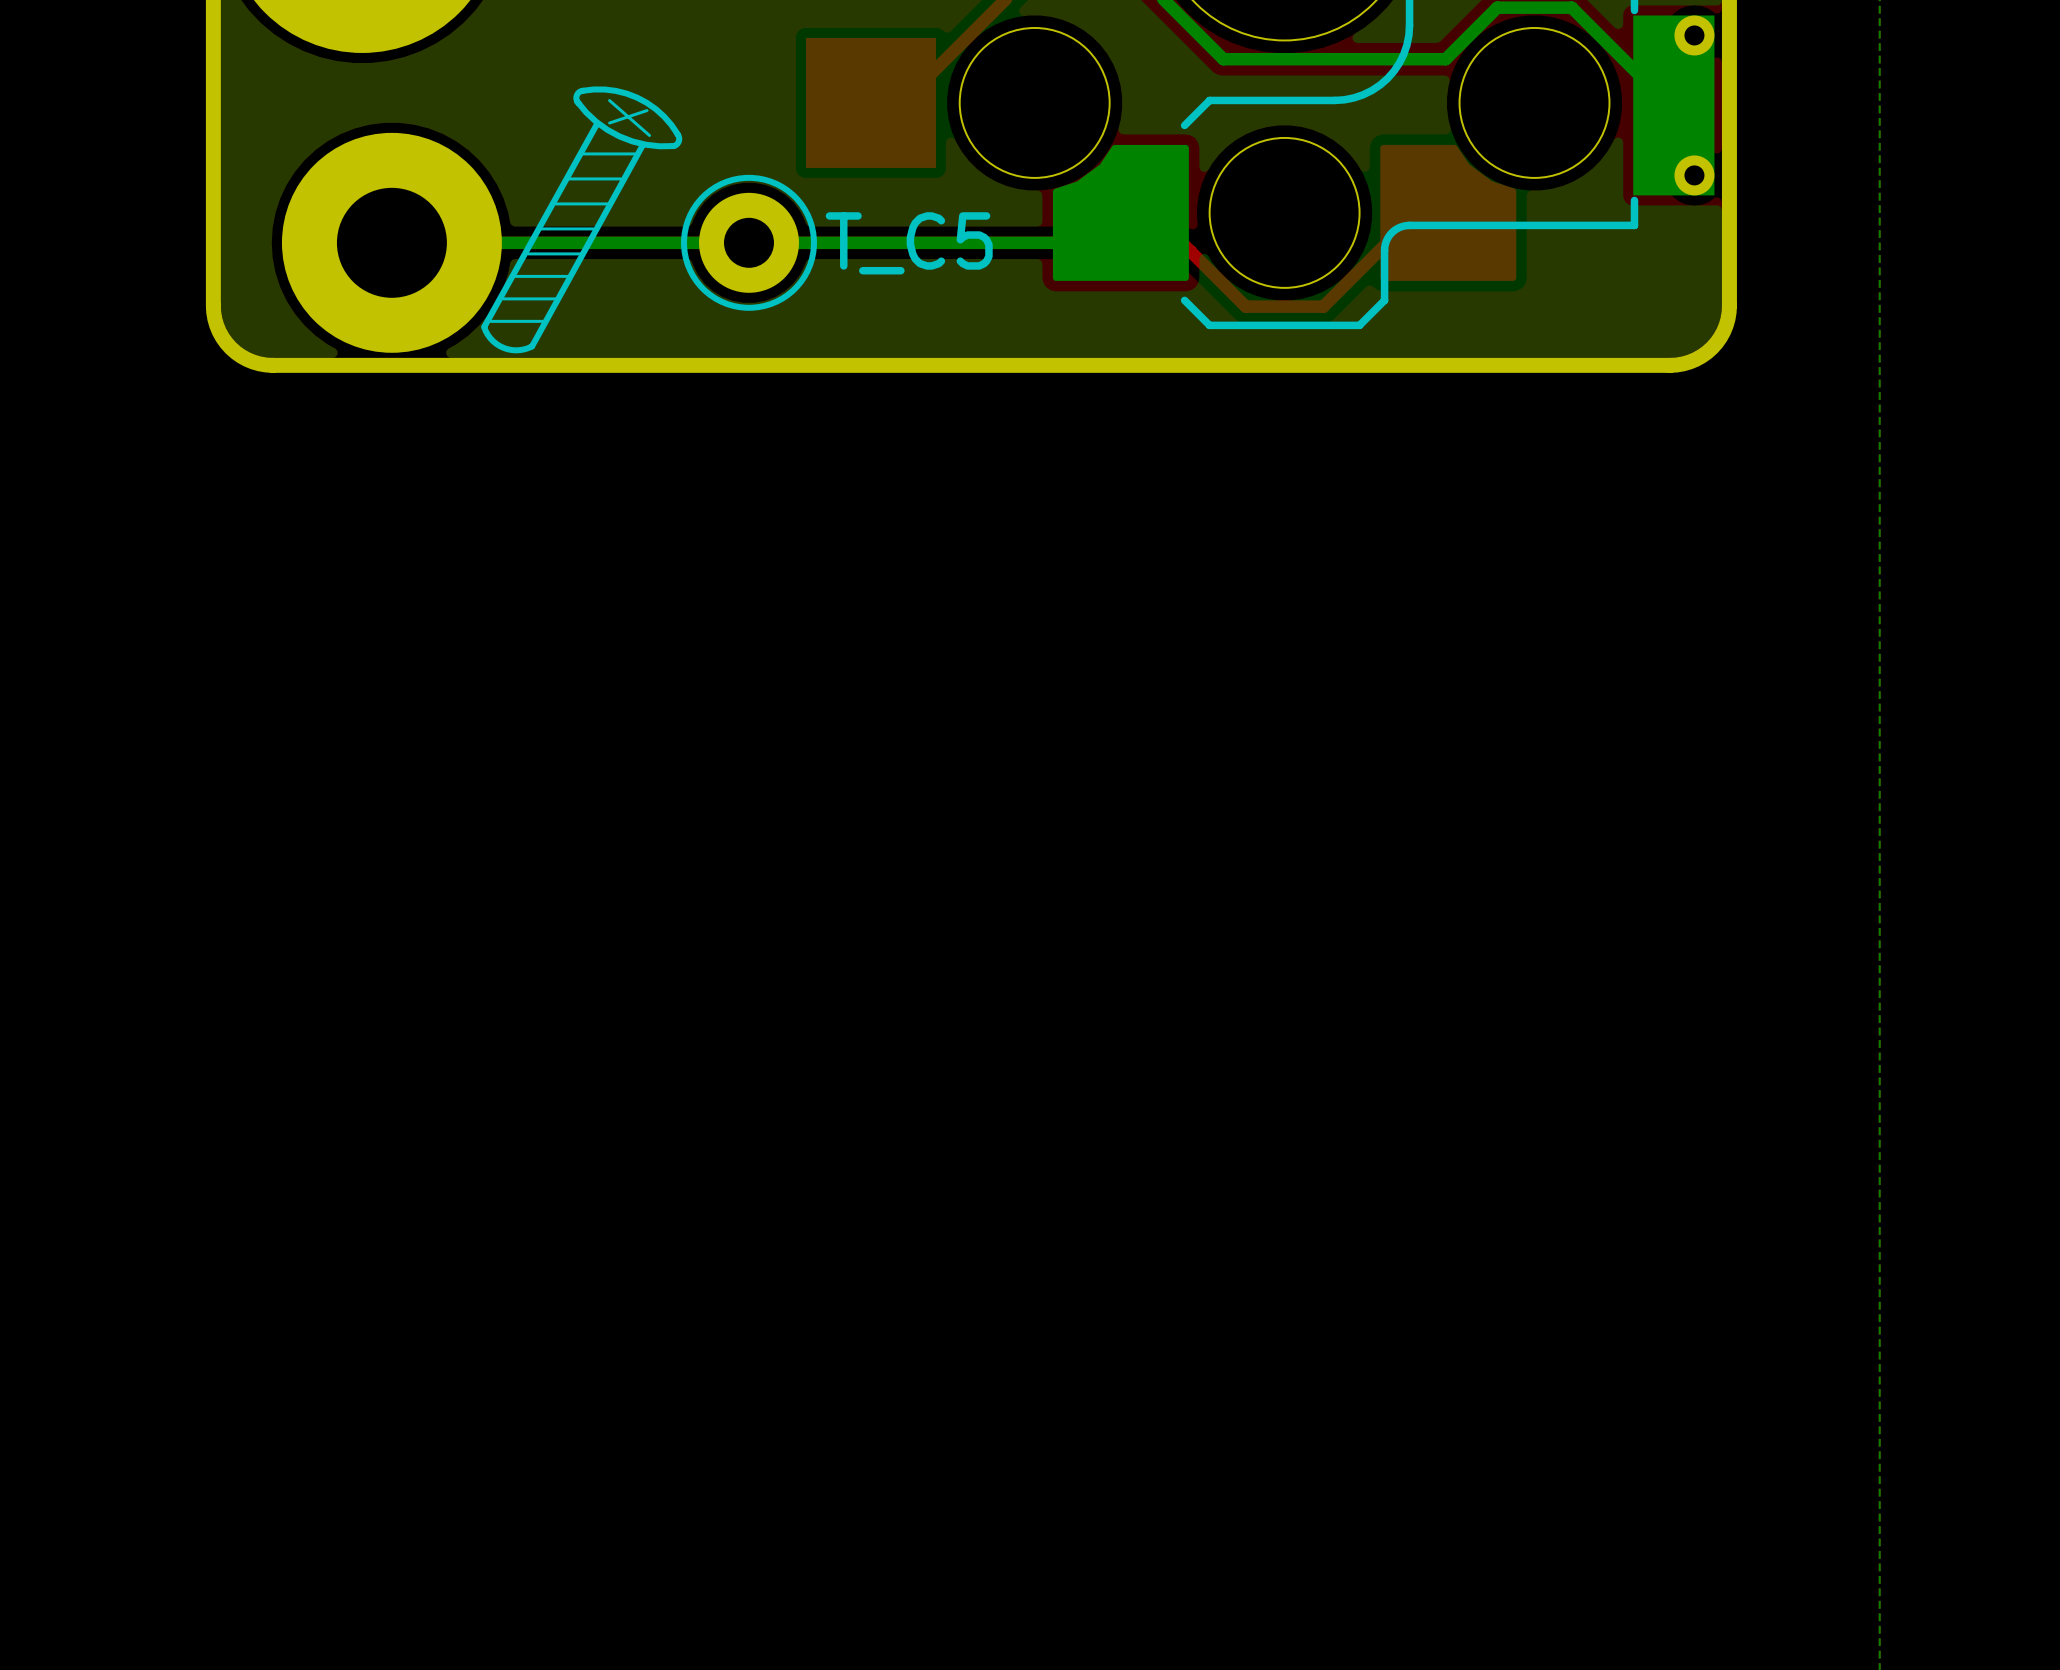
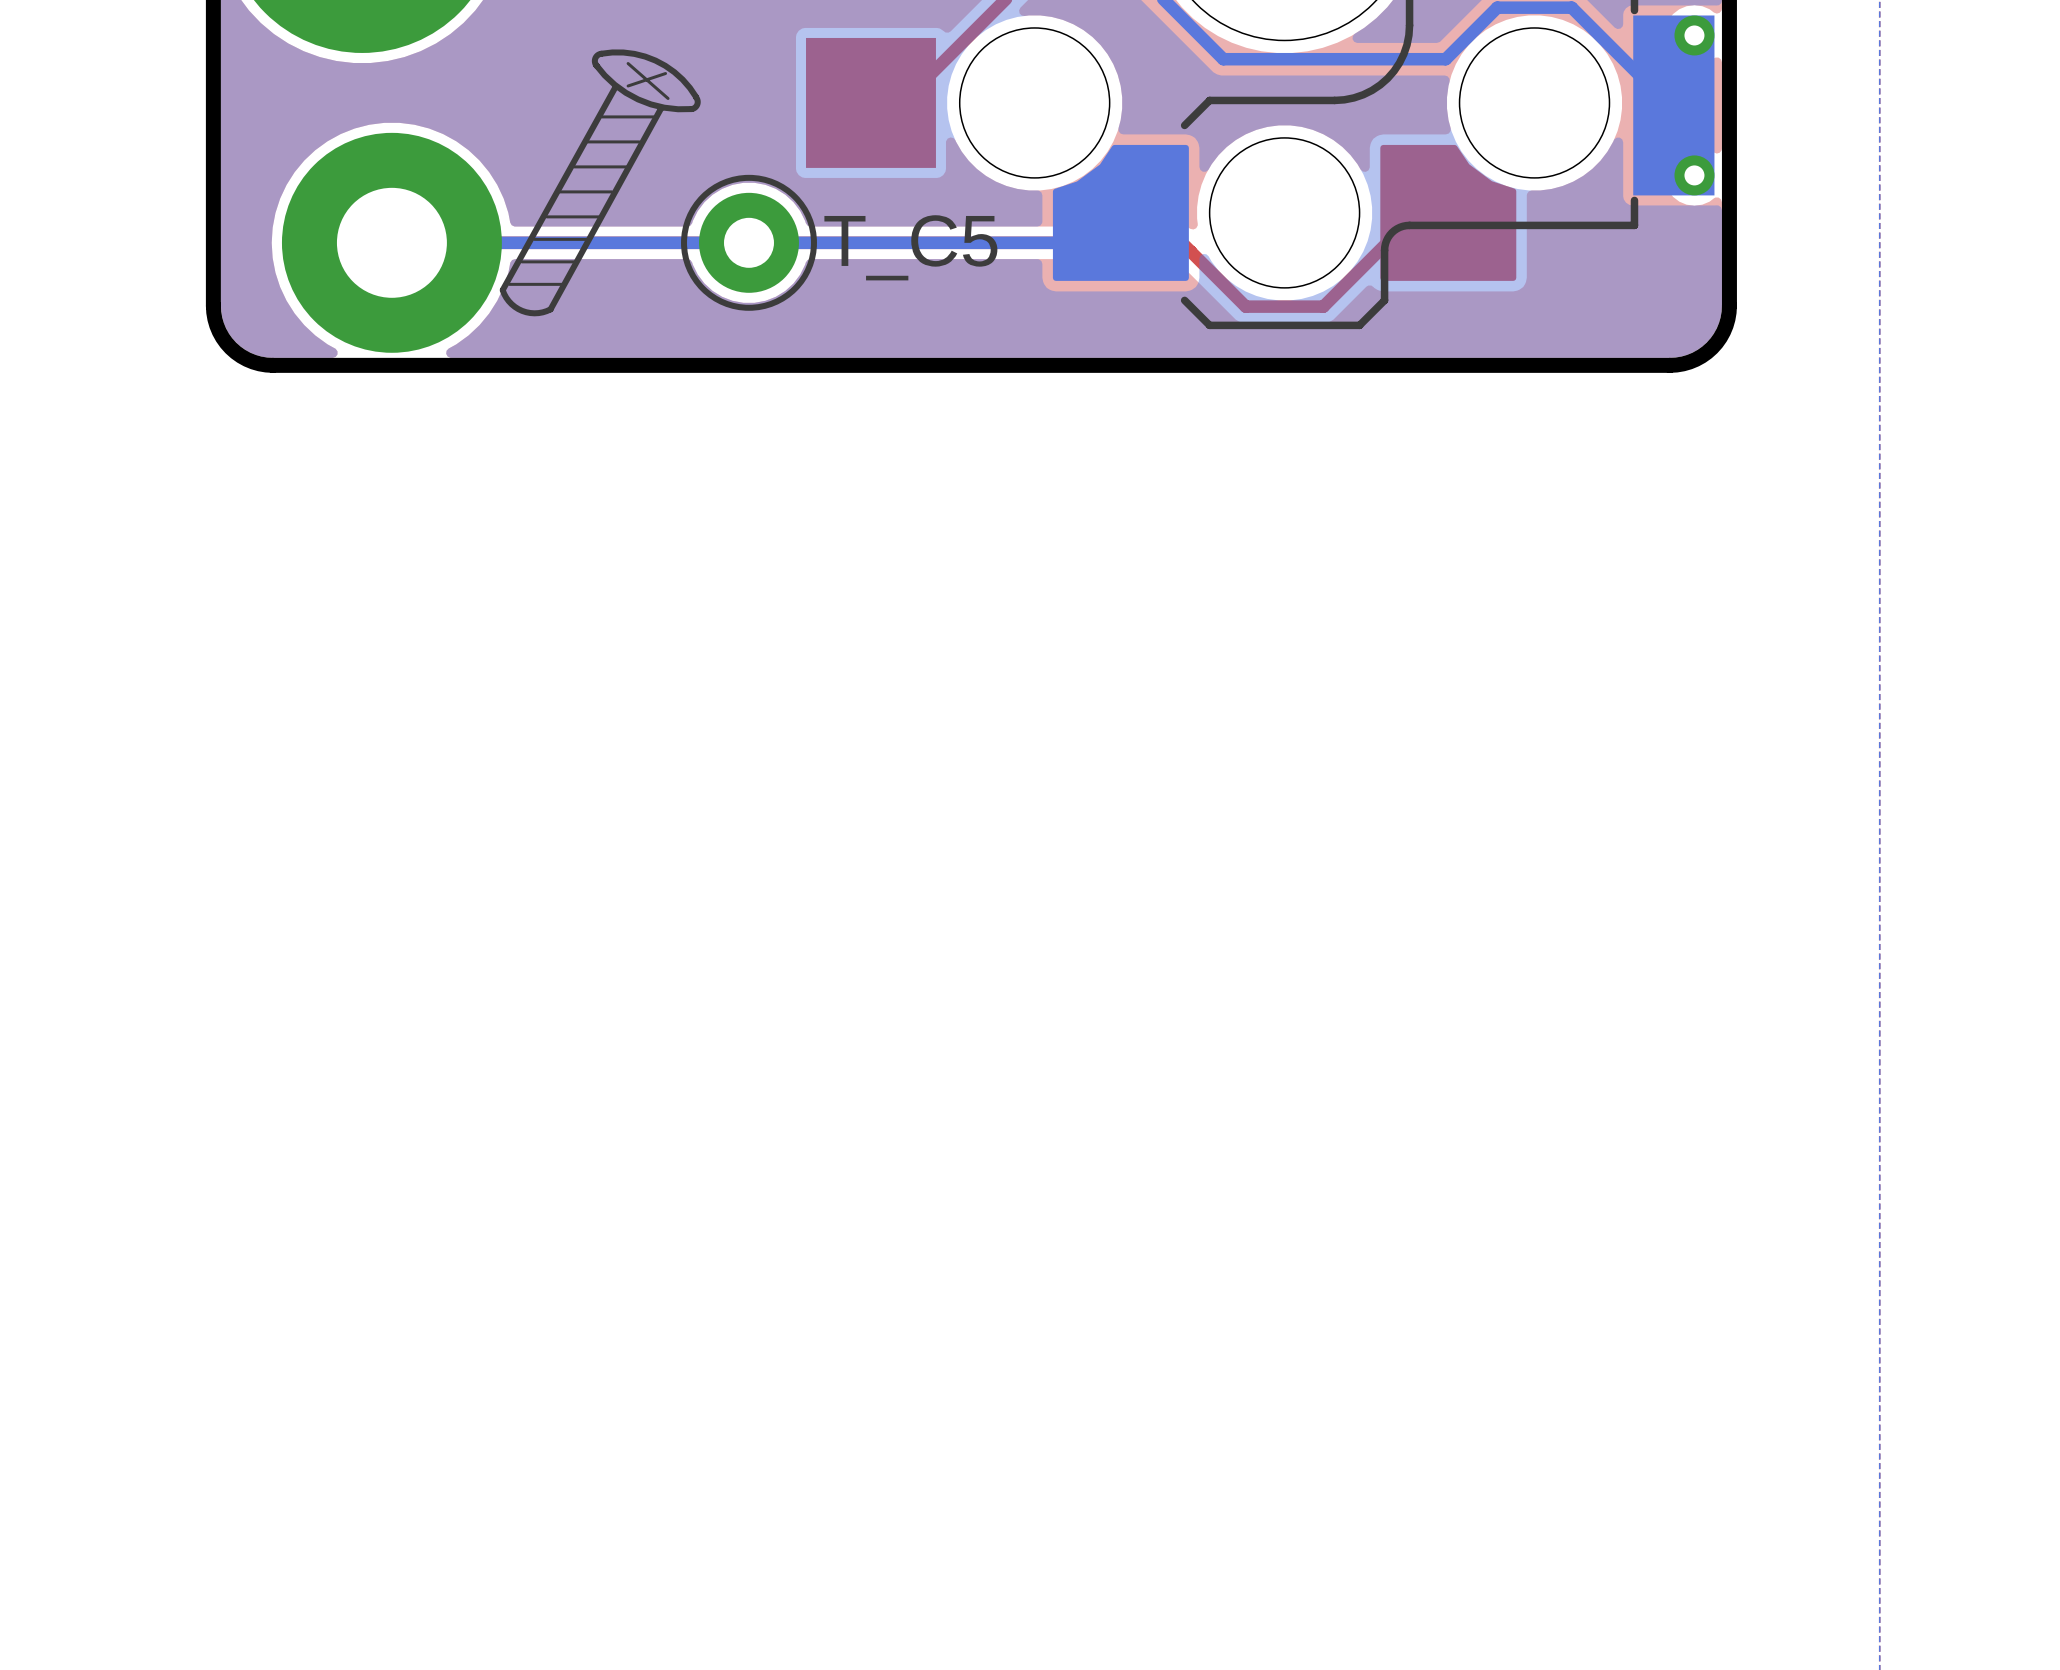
drawing position: (581, 219) -> (600, 182)

